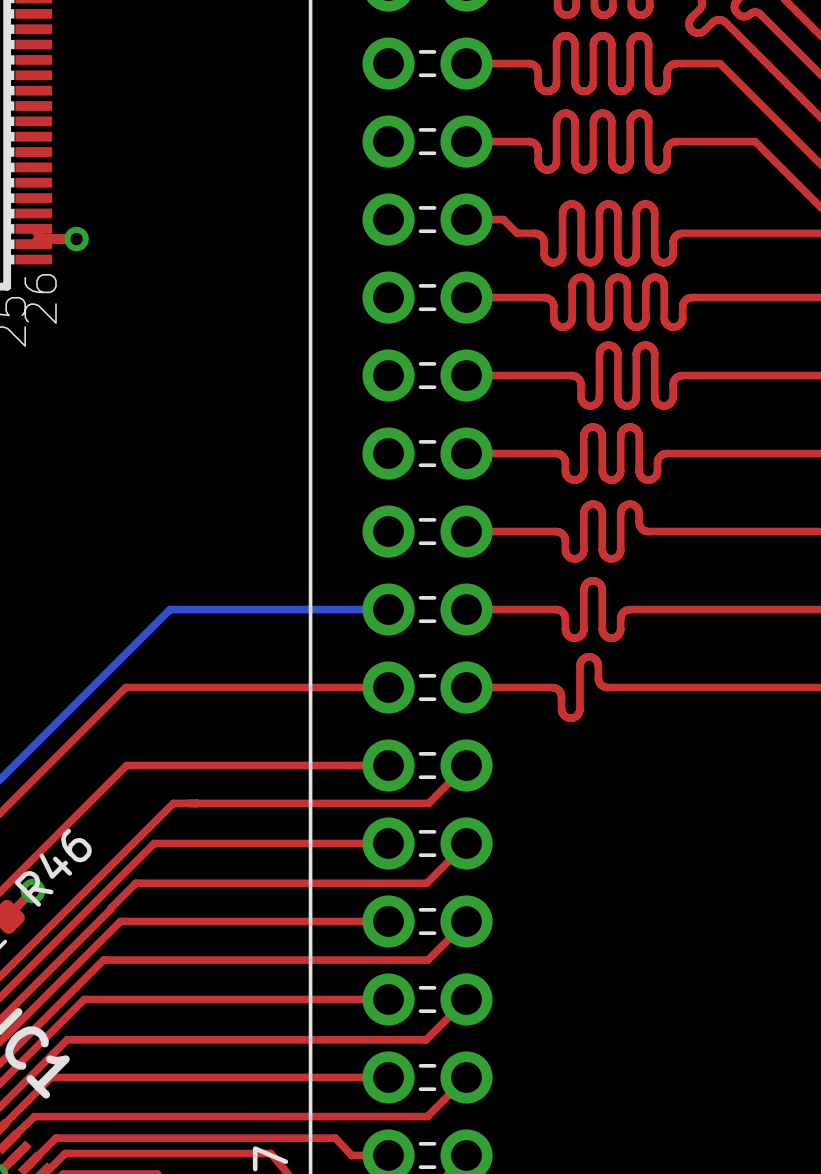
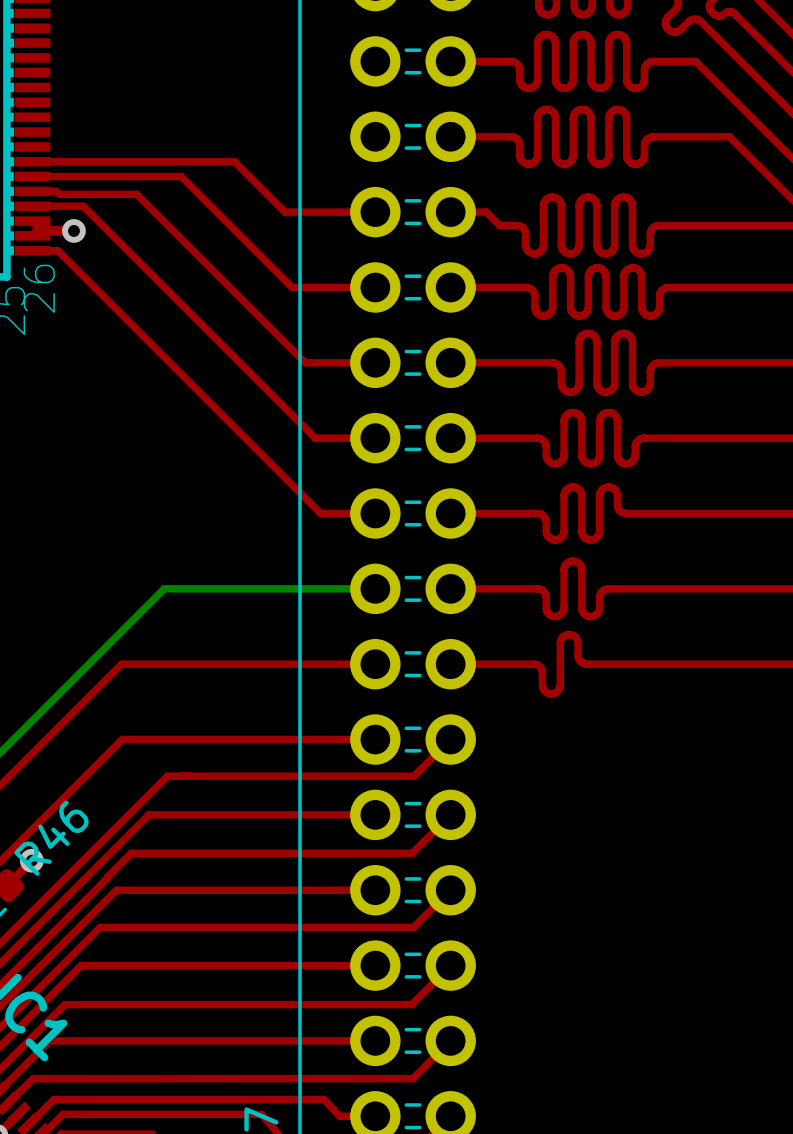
top track: none -> (32, 161) (234, 161) (285, 212) (375, 212)
top track: none -> (32, 176) (181, 176) (292, 287) (375, 287)
top track: none -> (32, 191) (56, 191) (59, 194) (136, 194) (305, 362) (375, 362)
top track: none -> (32, 206) (83, 206) (315, 438) (375, 438)
top track: none -> (32, 250) (57, 250) (320, 513) (375, 513)

